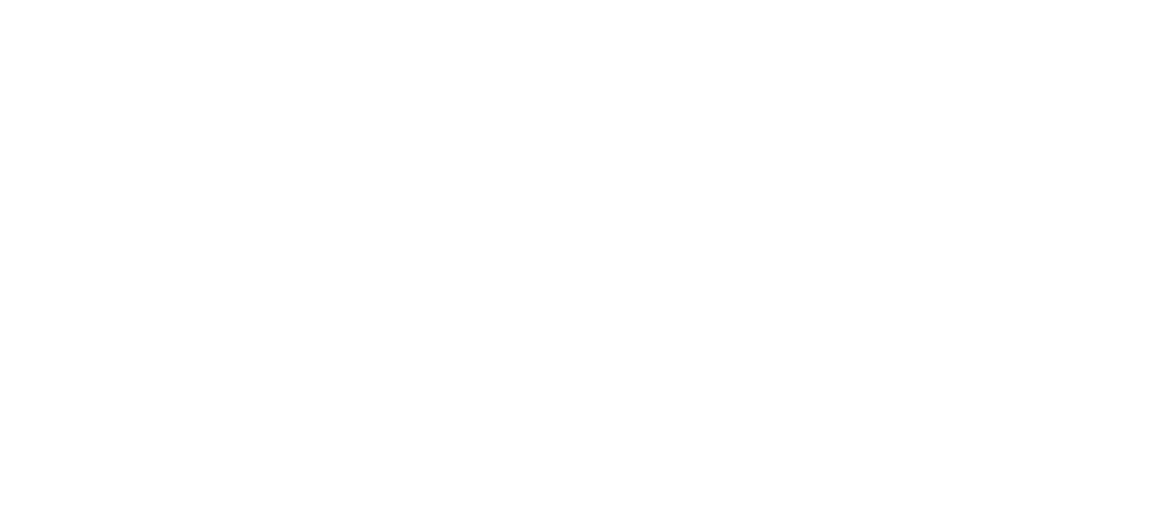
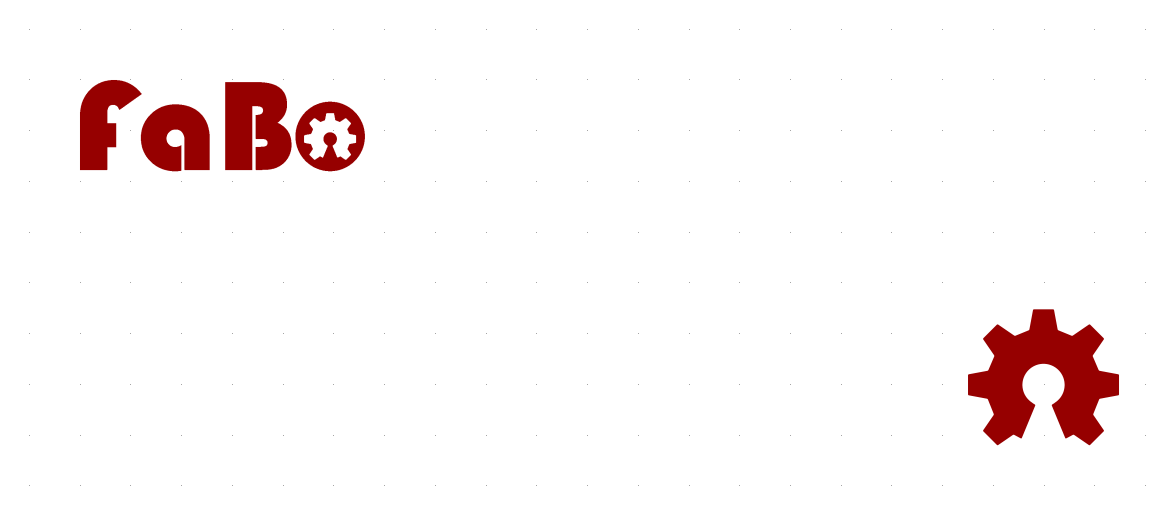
part: none -> (222, 125)
part: none -> (1043, 377)

